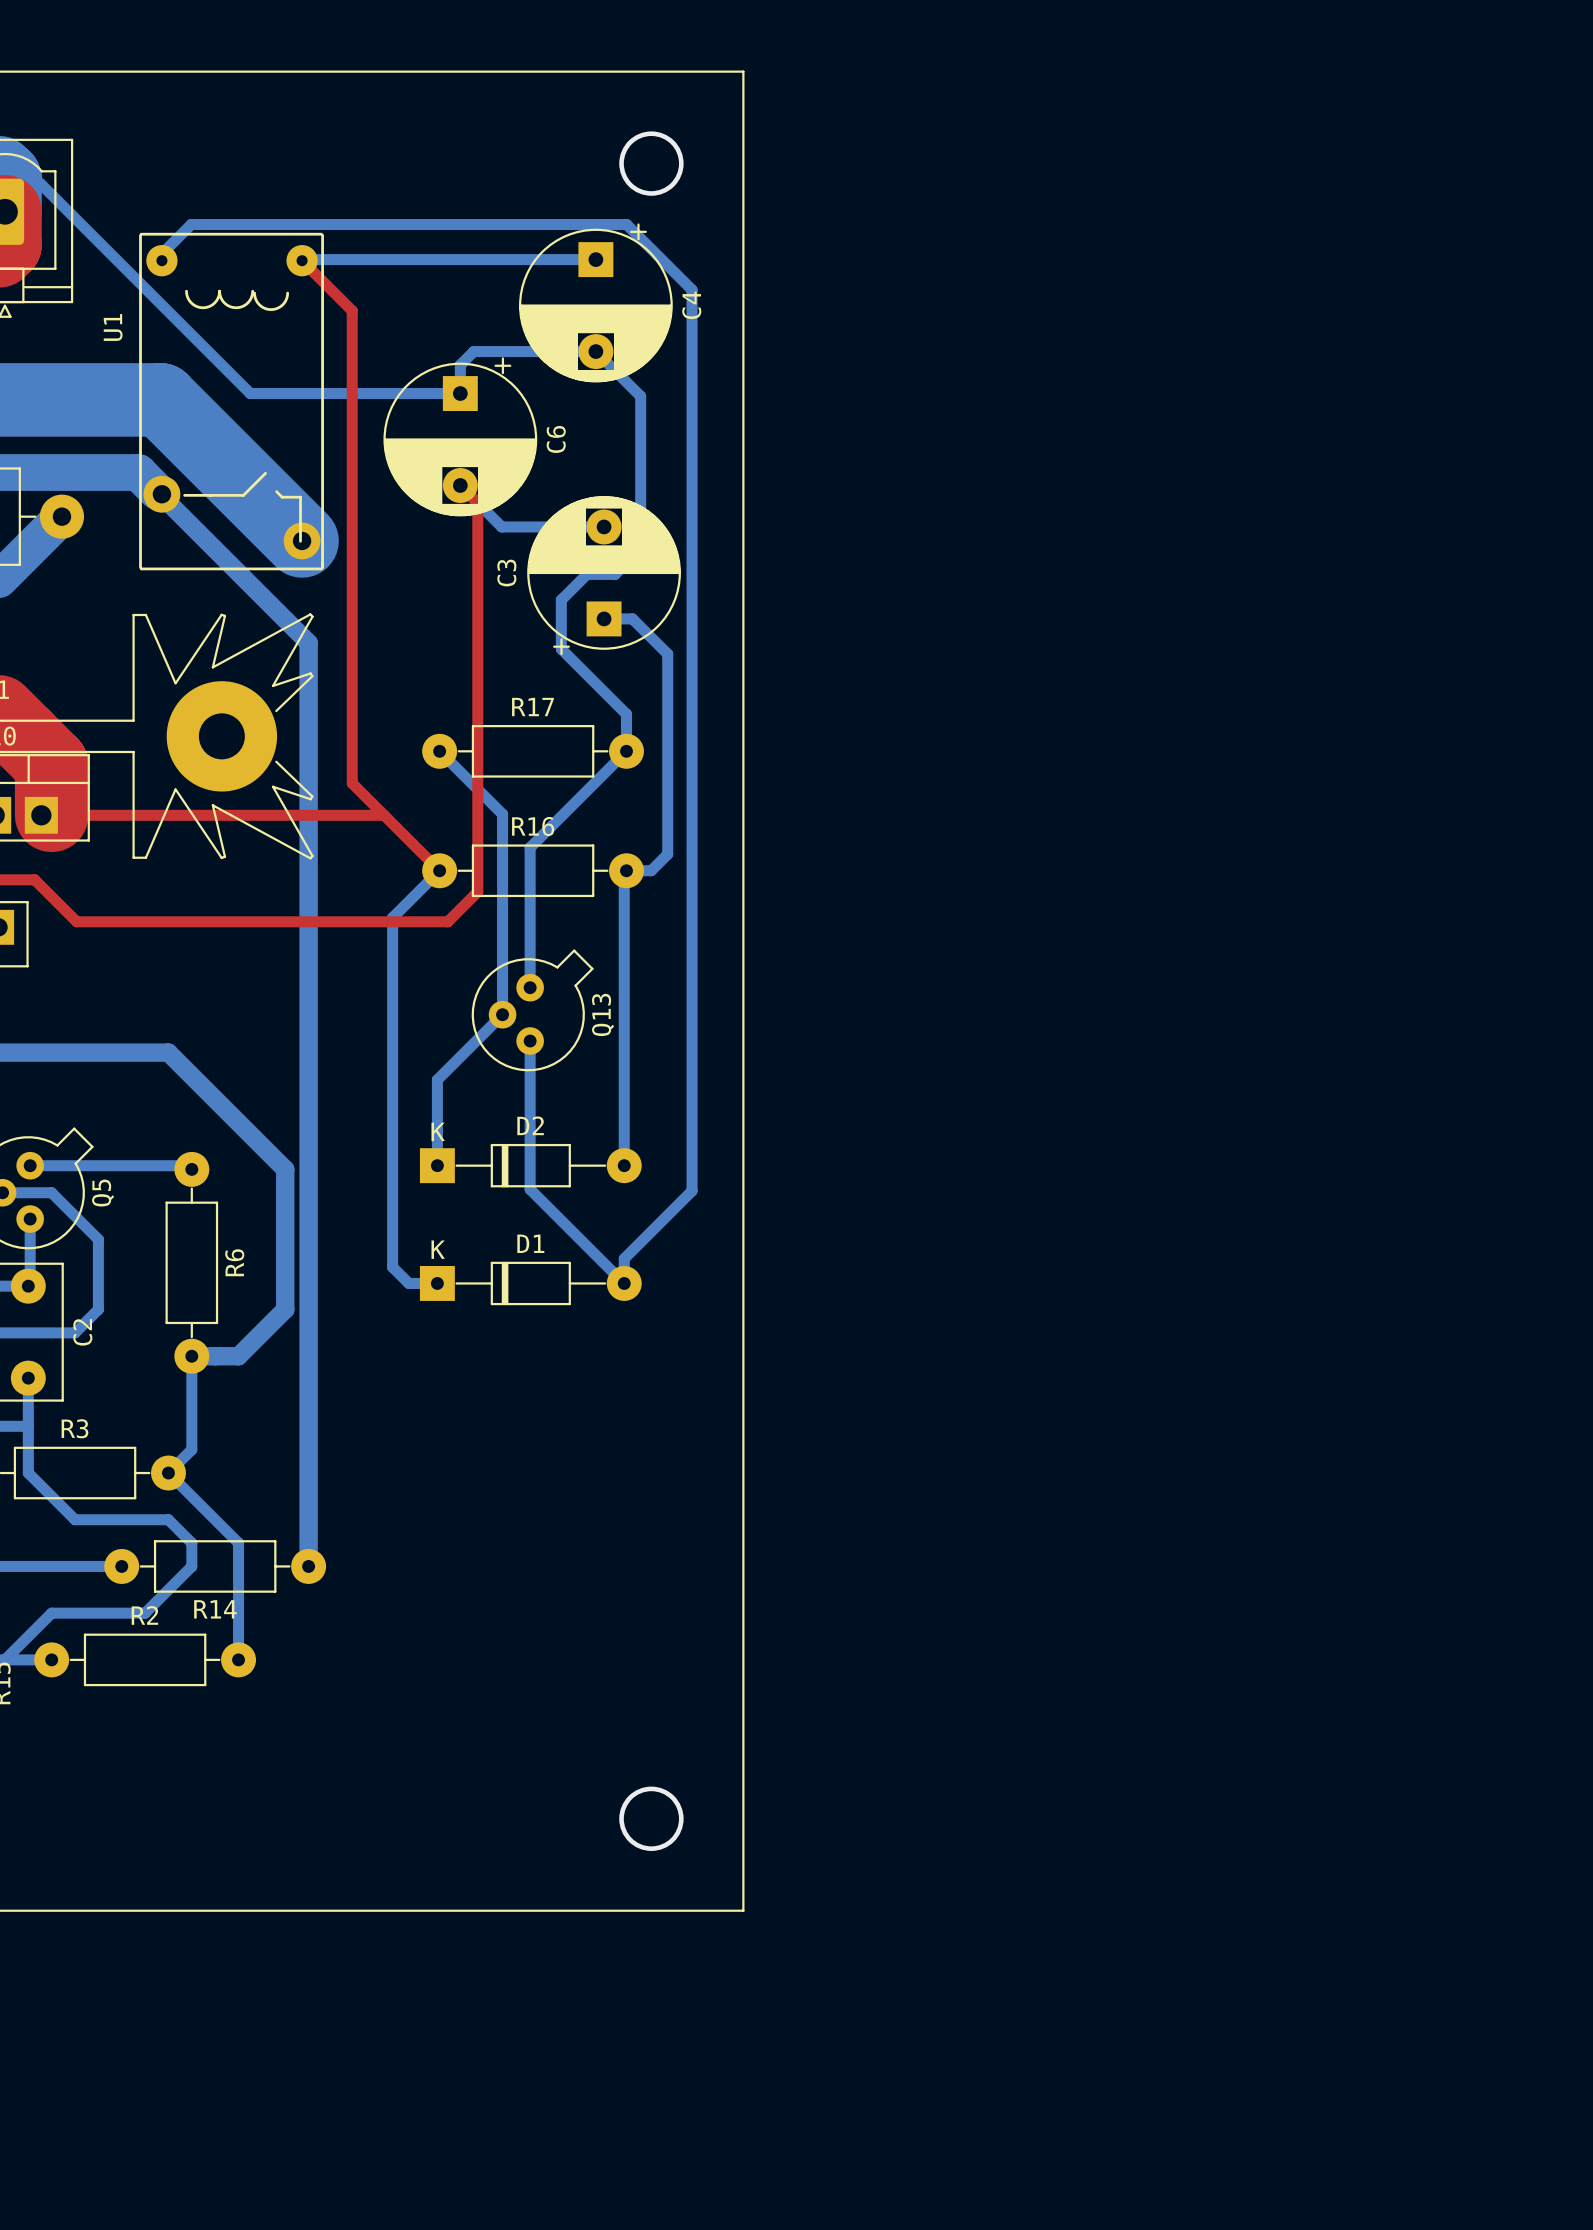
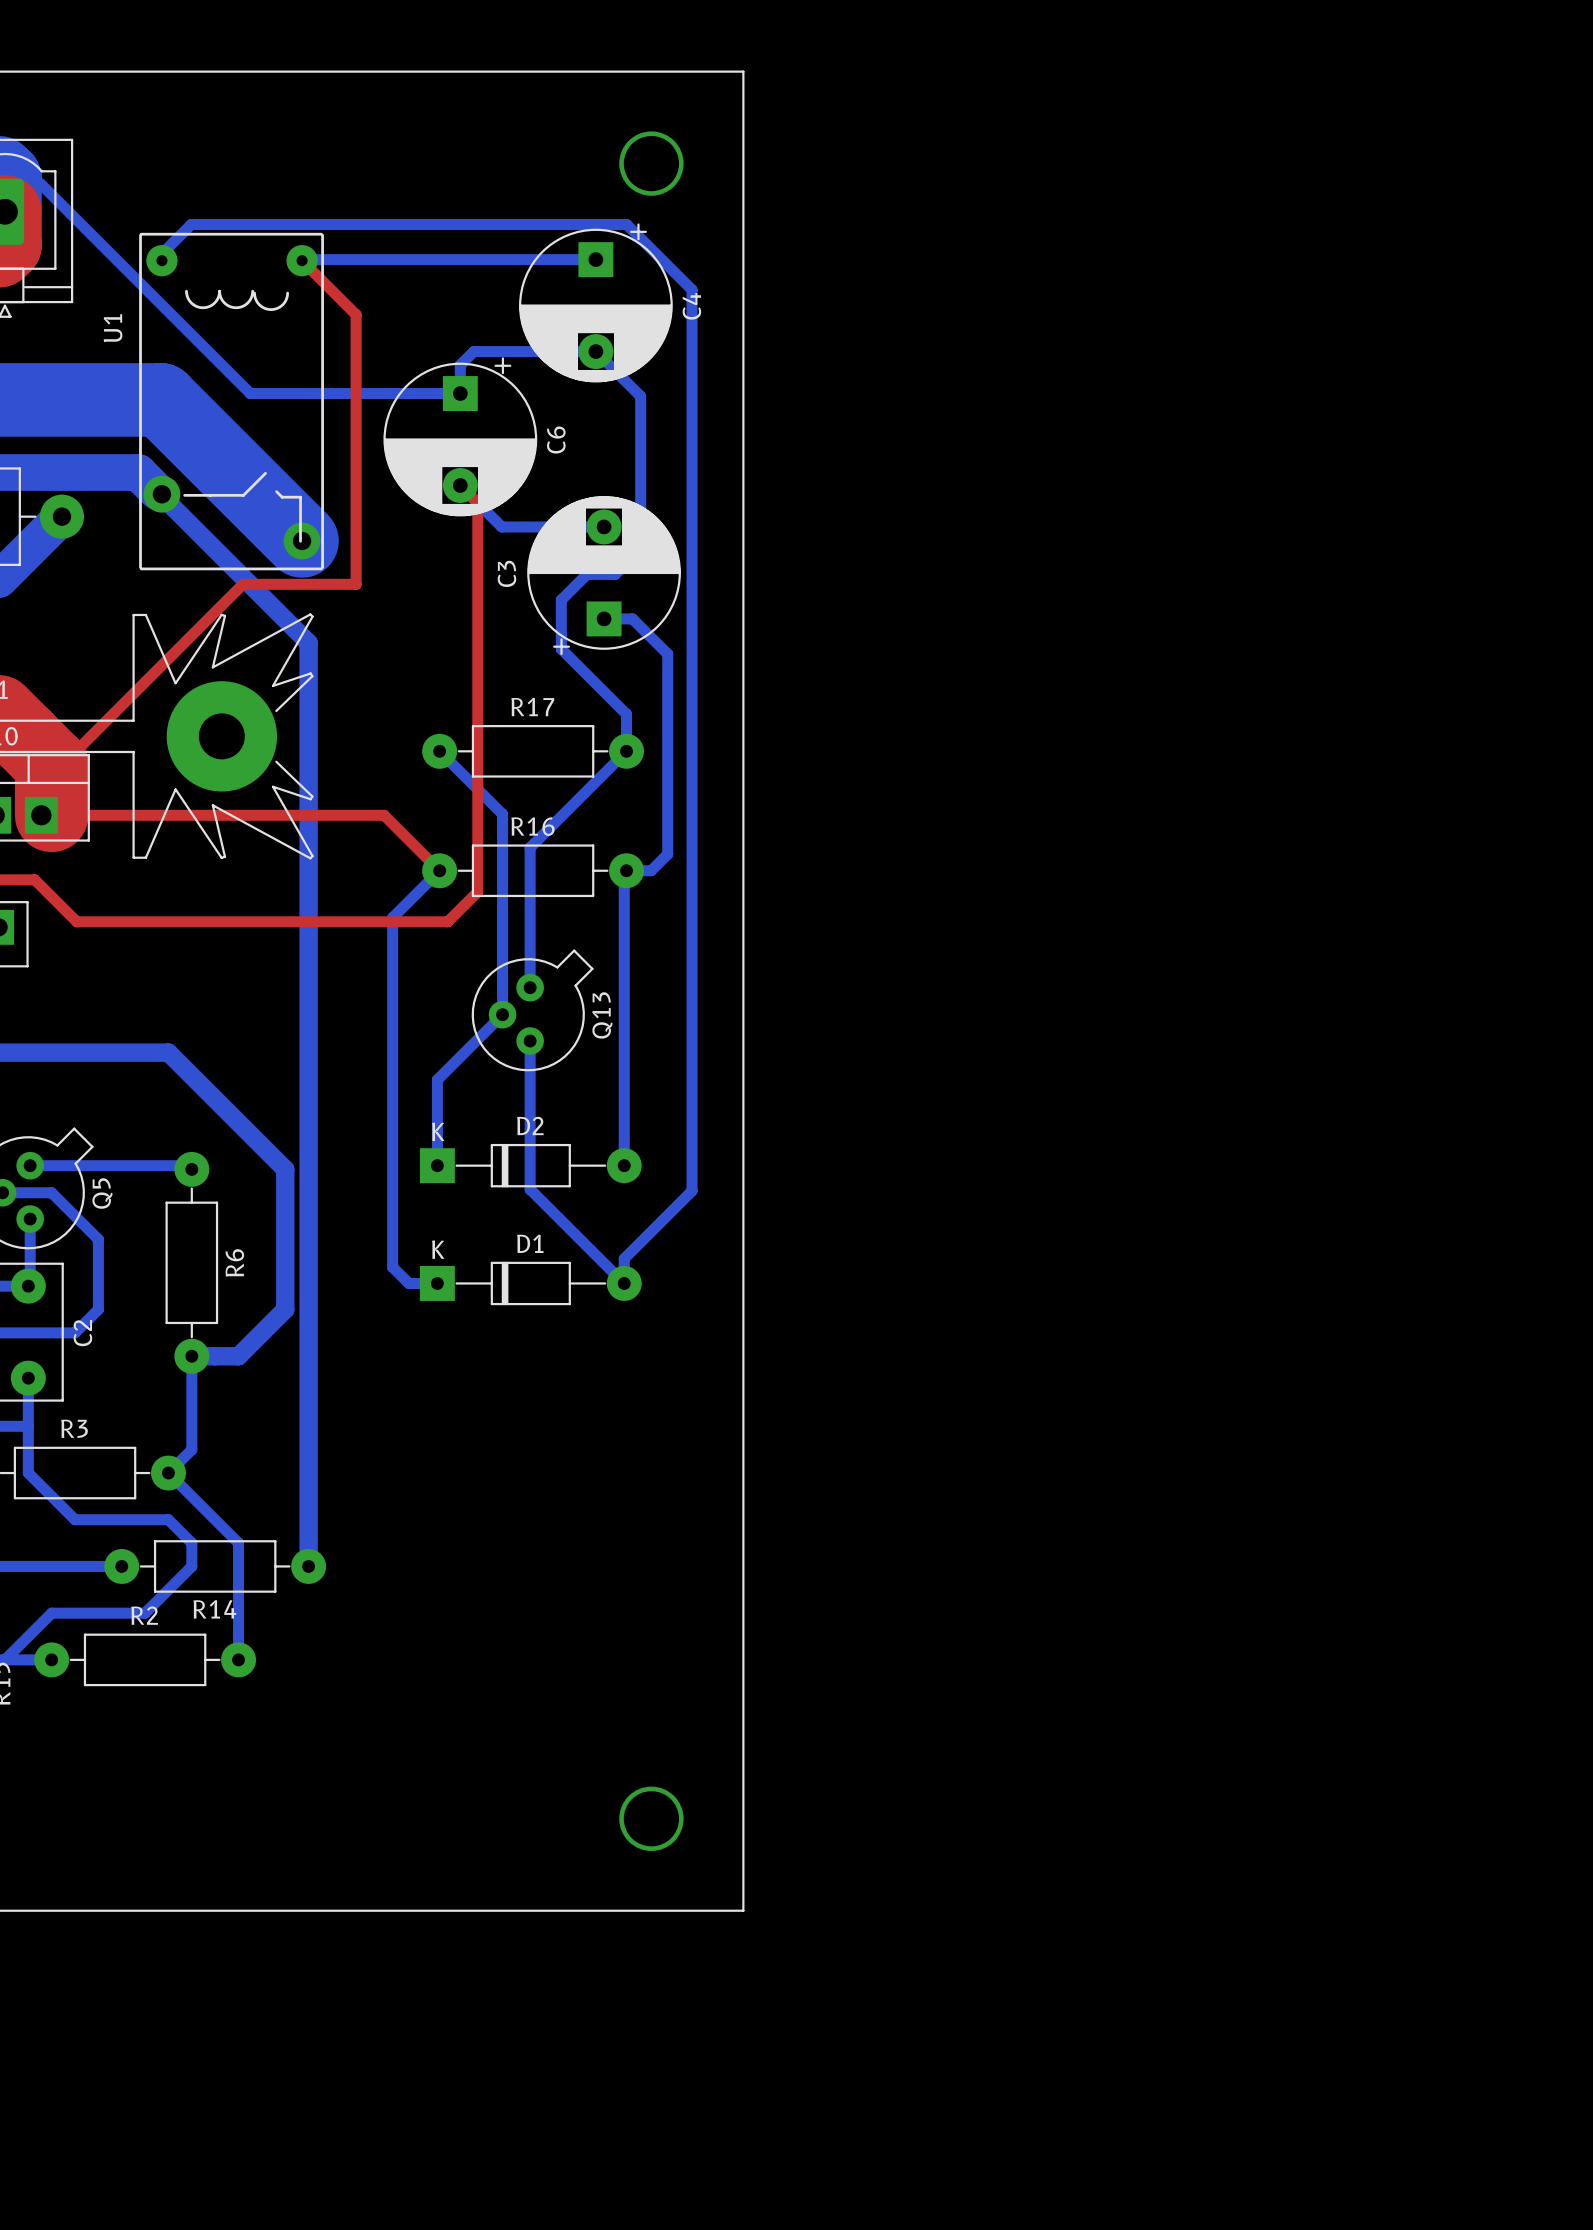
top track: (352, 310) (352, 783) (384, 815) -> (352, 310) (356, 314) (356, 584) (242, 584) (41, 785)

